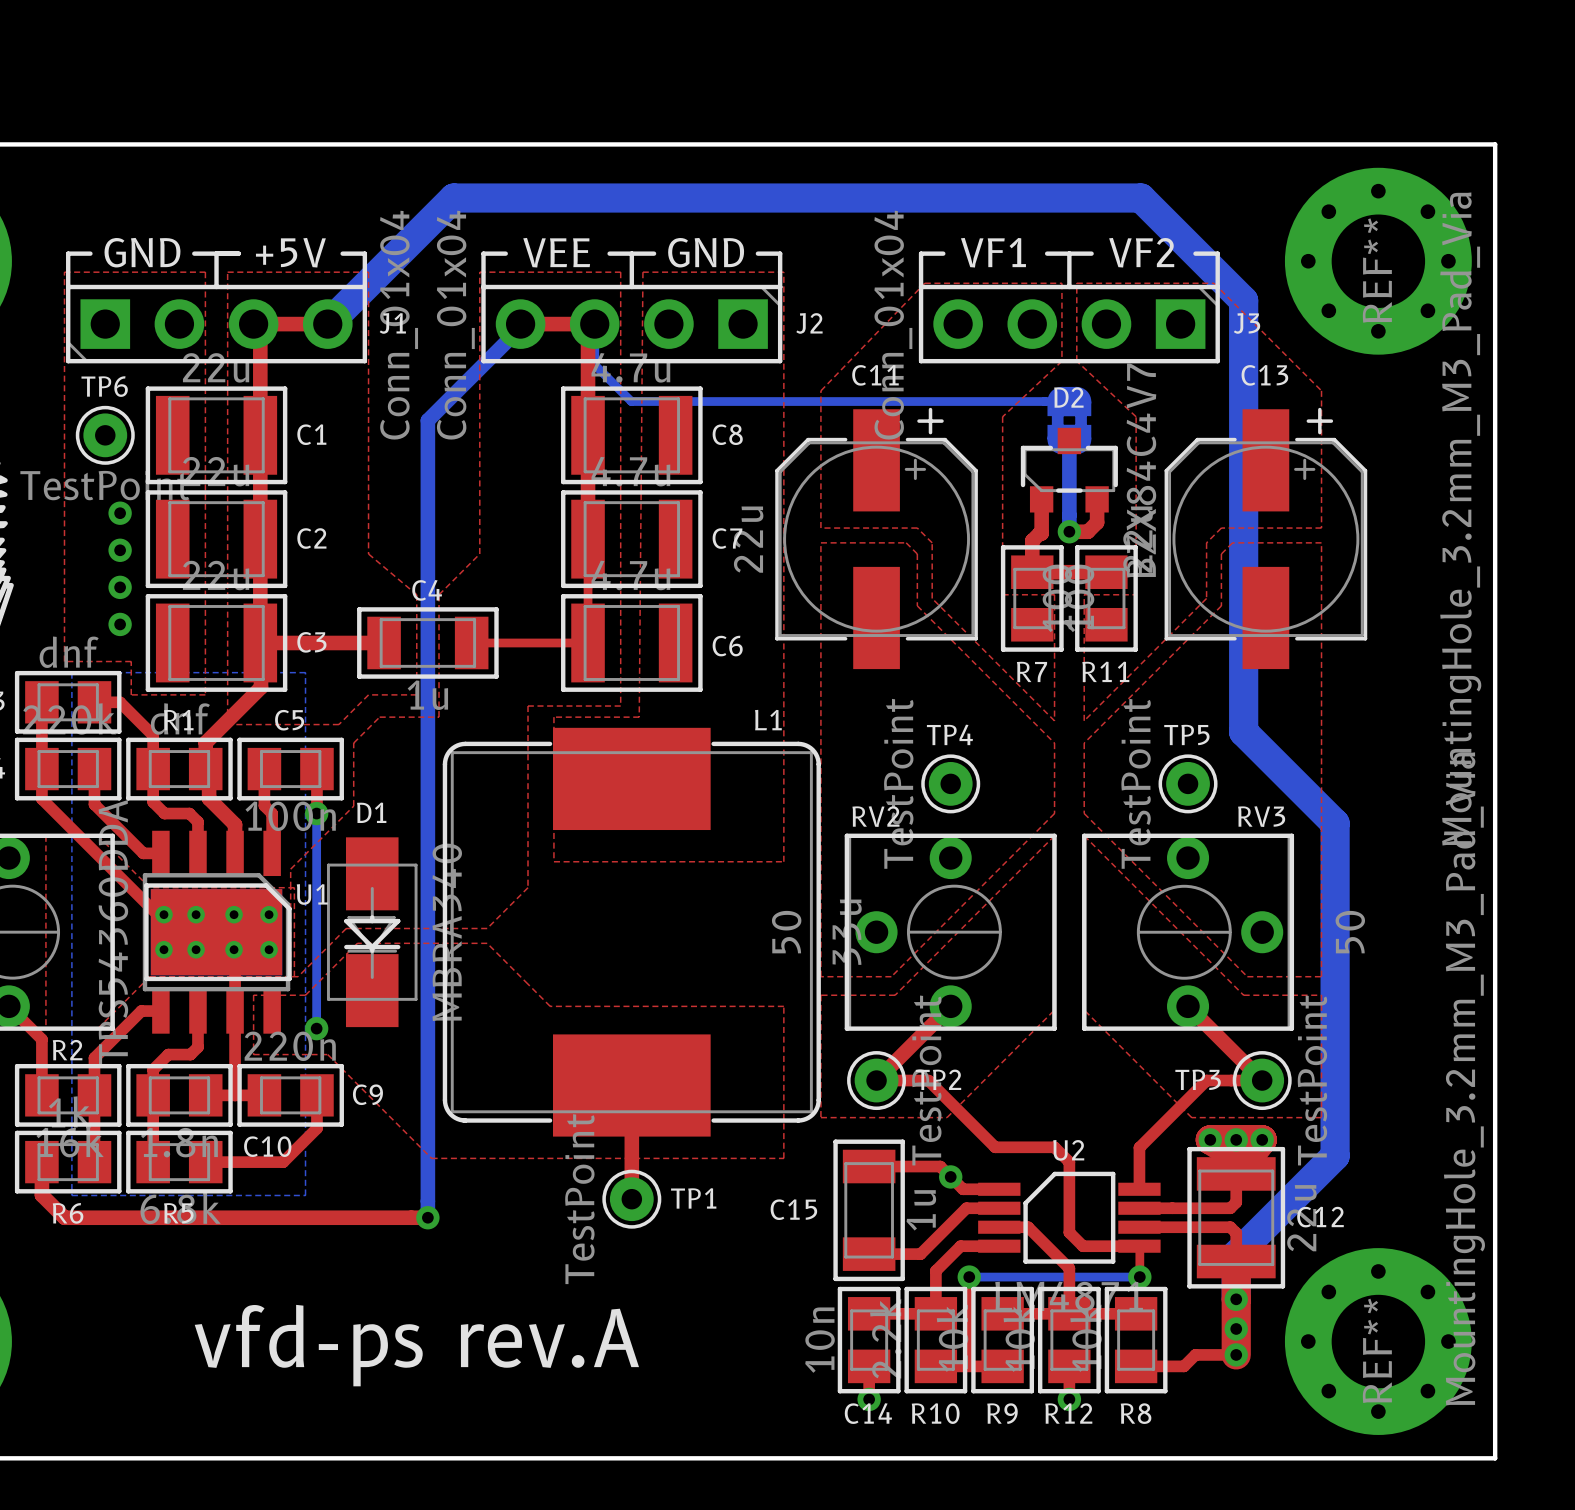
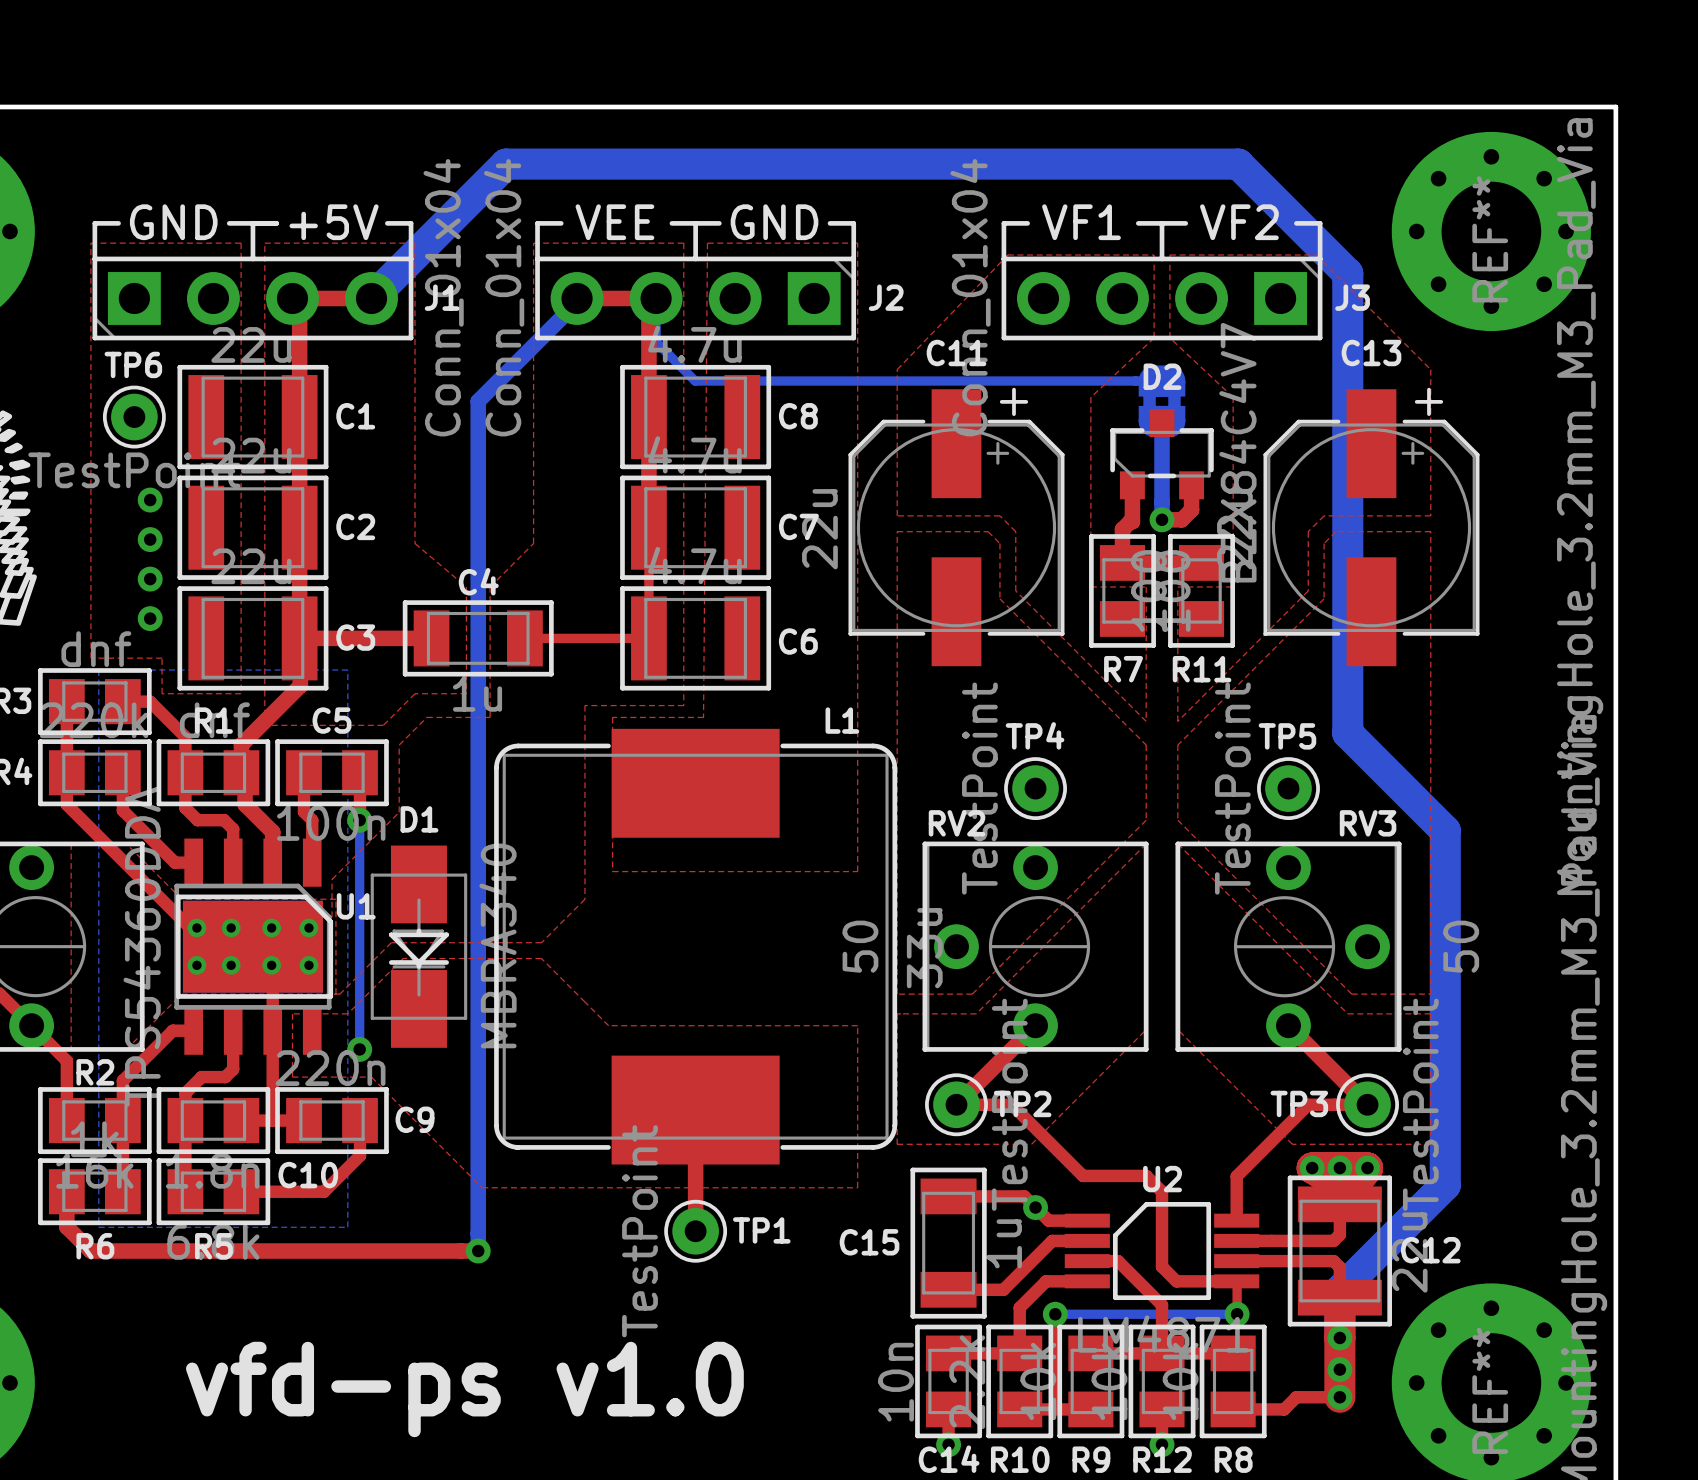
text: vfd-ps rev.A (416, 1345) -> vfd-ps v1.0 (464, 1389)

